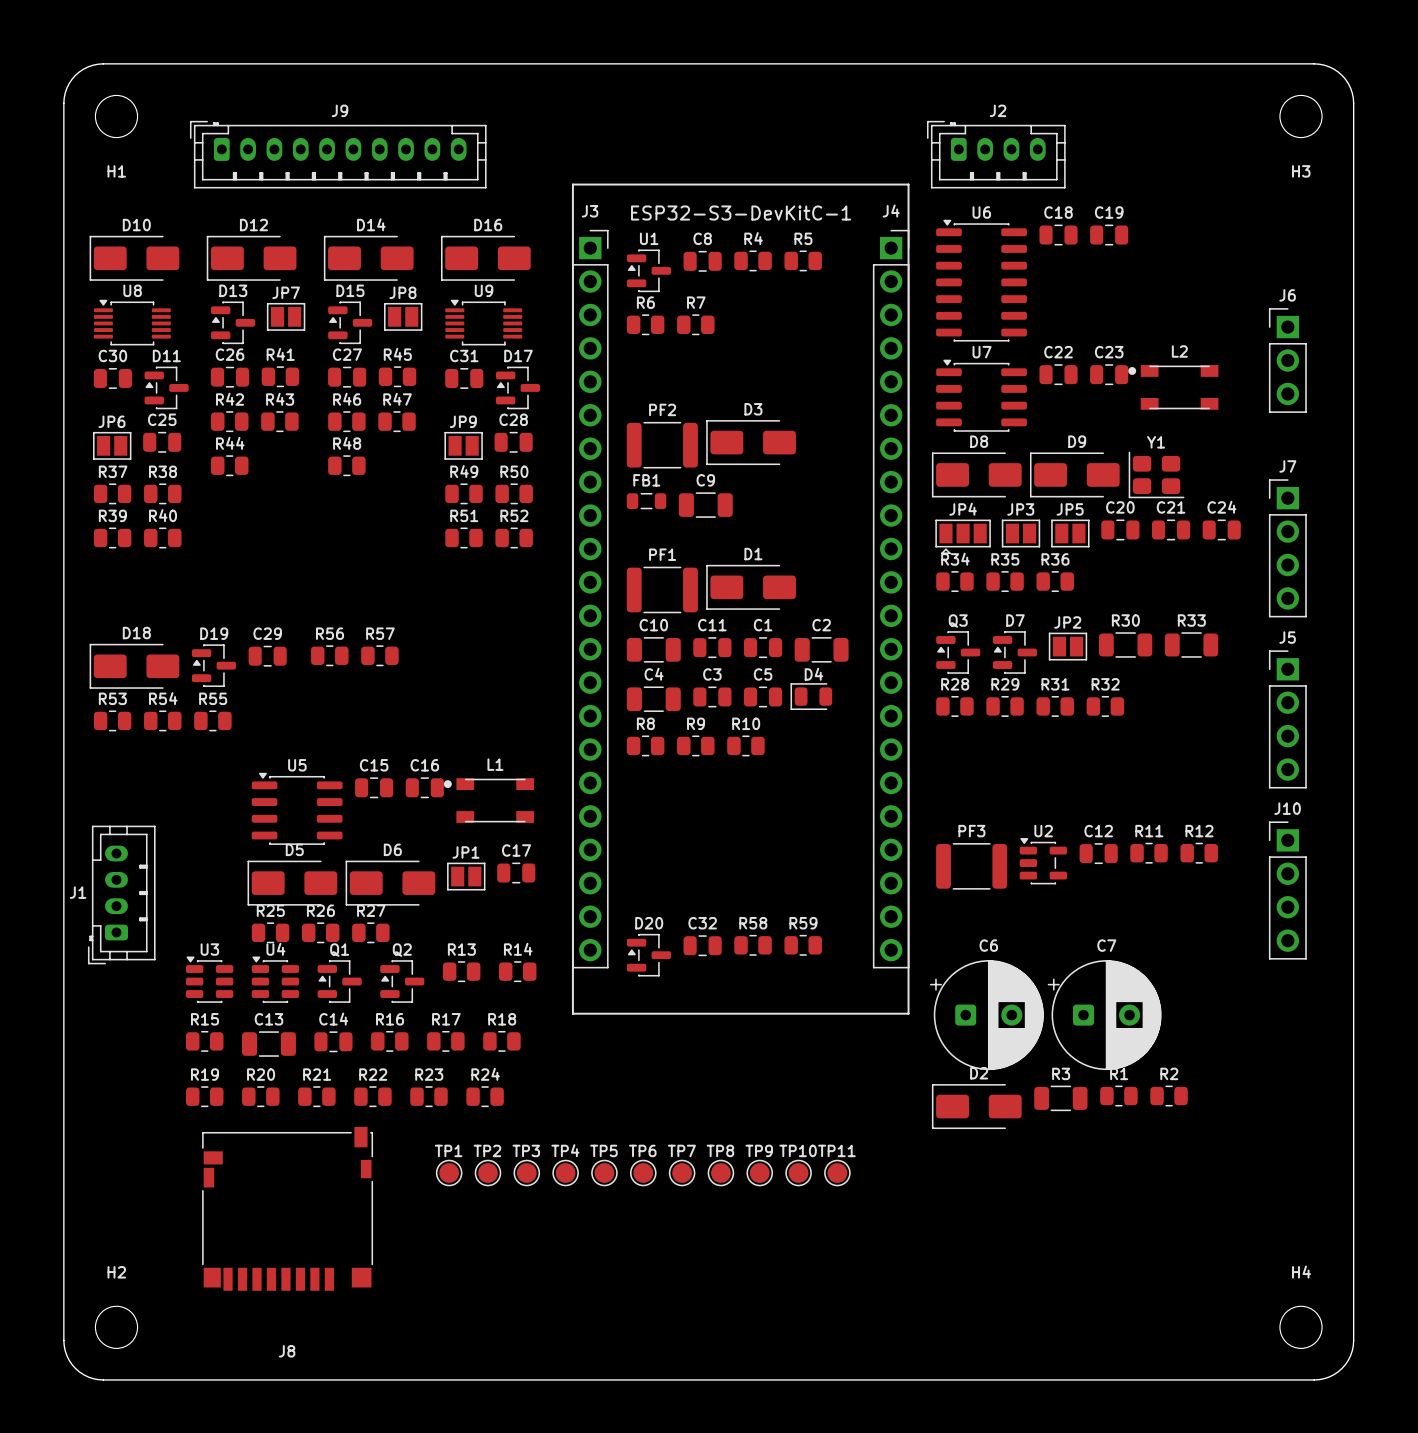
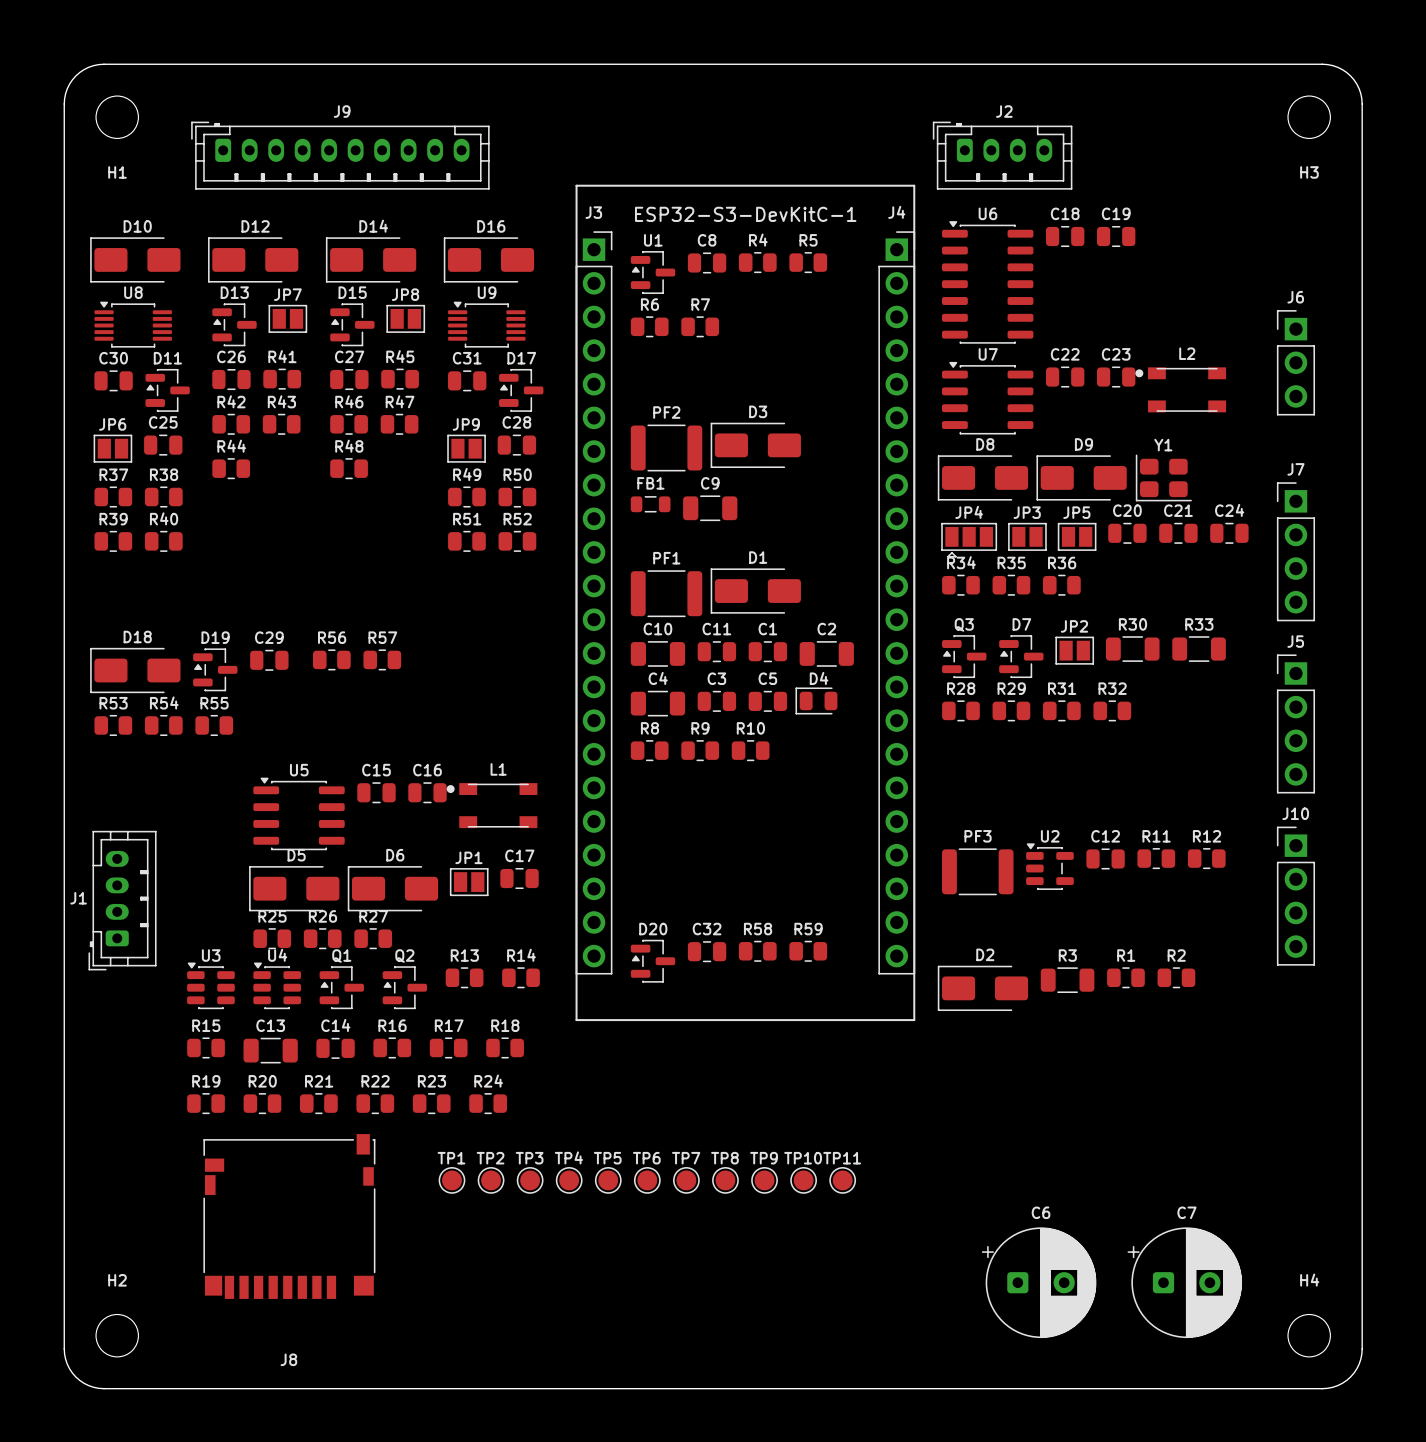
C6 position: (986, 1015) -> (1039, 1282)
C7 position: (1104, 1015) -> (1184, 1282)
R1 position: (1118, 1096) -> (1125, 977)
R2 position: (1169, 1096) -> (1176, 977)
R3 position: (1060, 1098) -> (1067, 980)
D2 position: (976, 1106) -> (982, 988)

